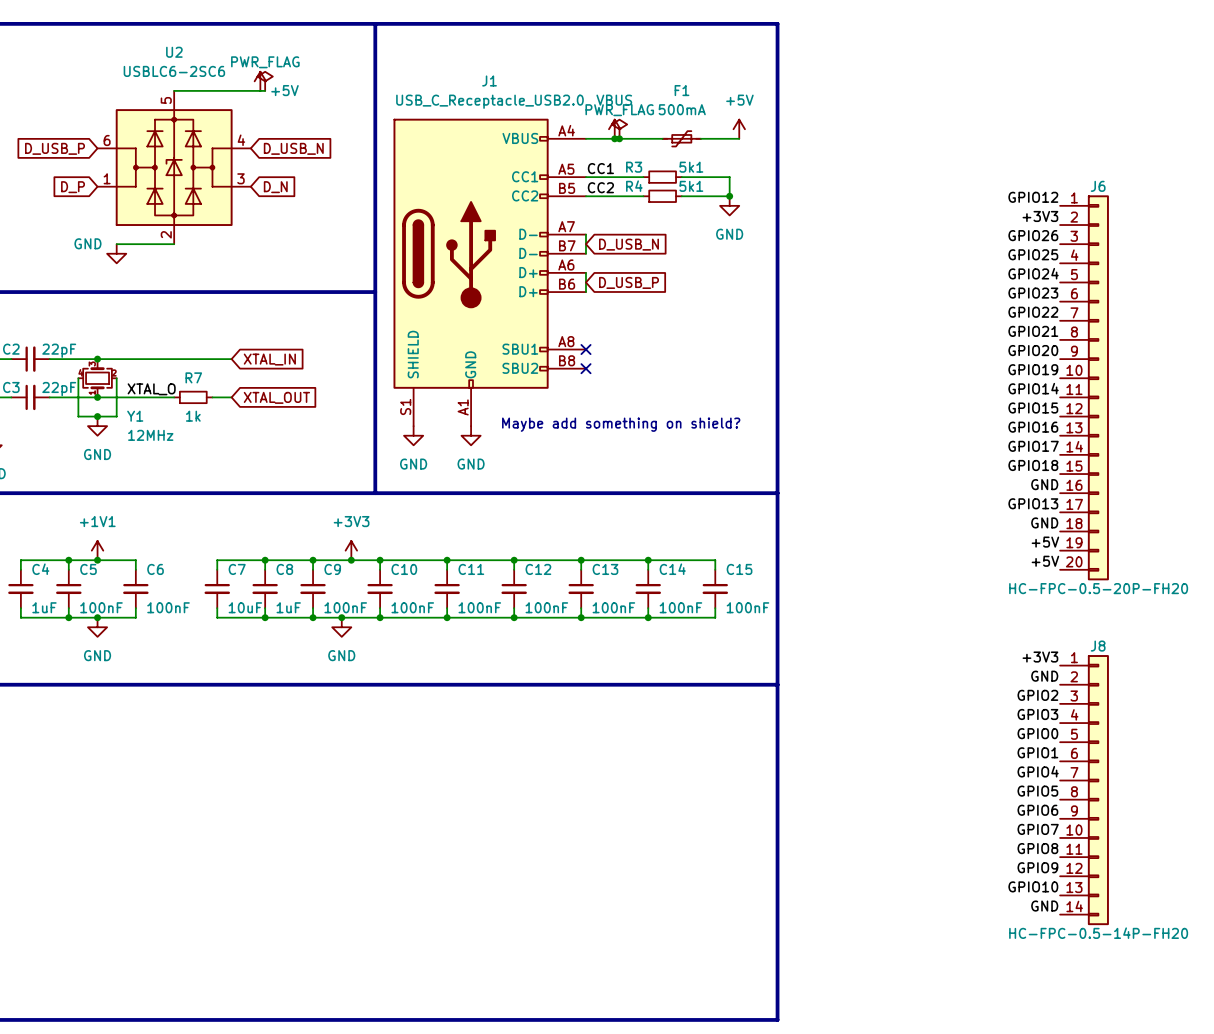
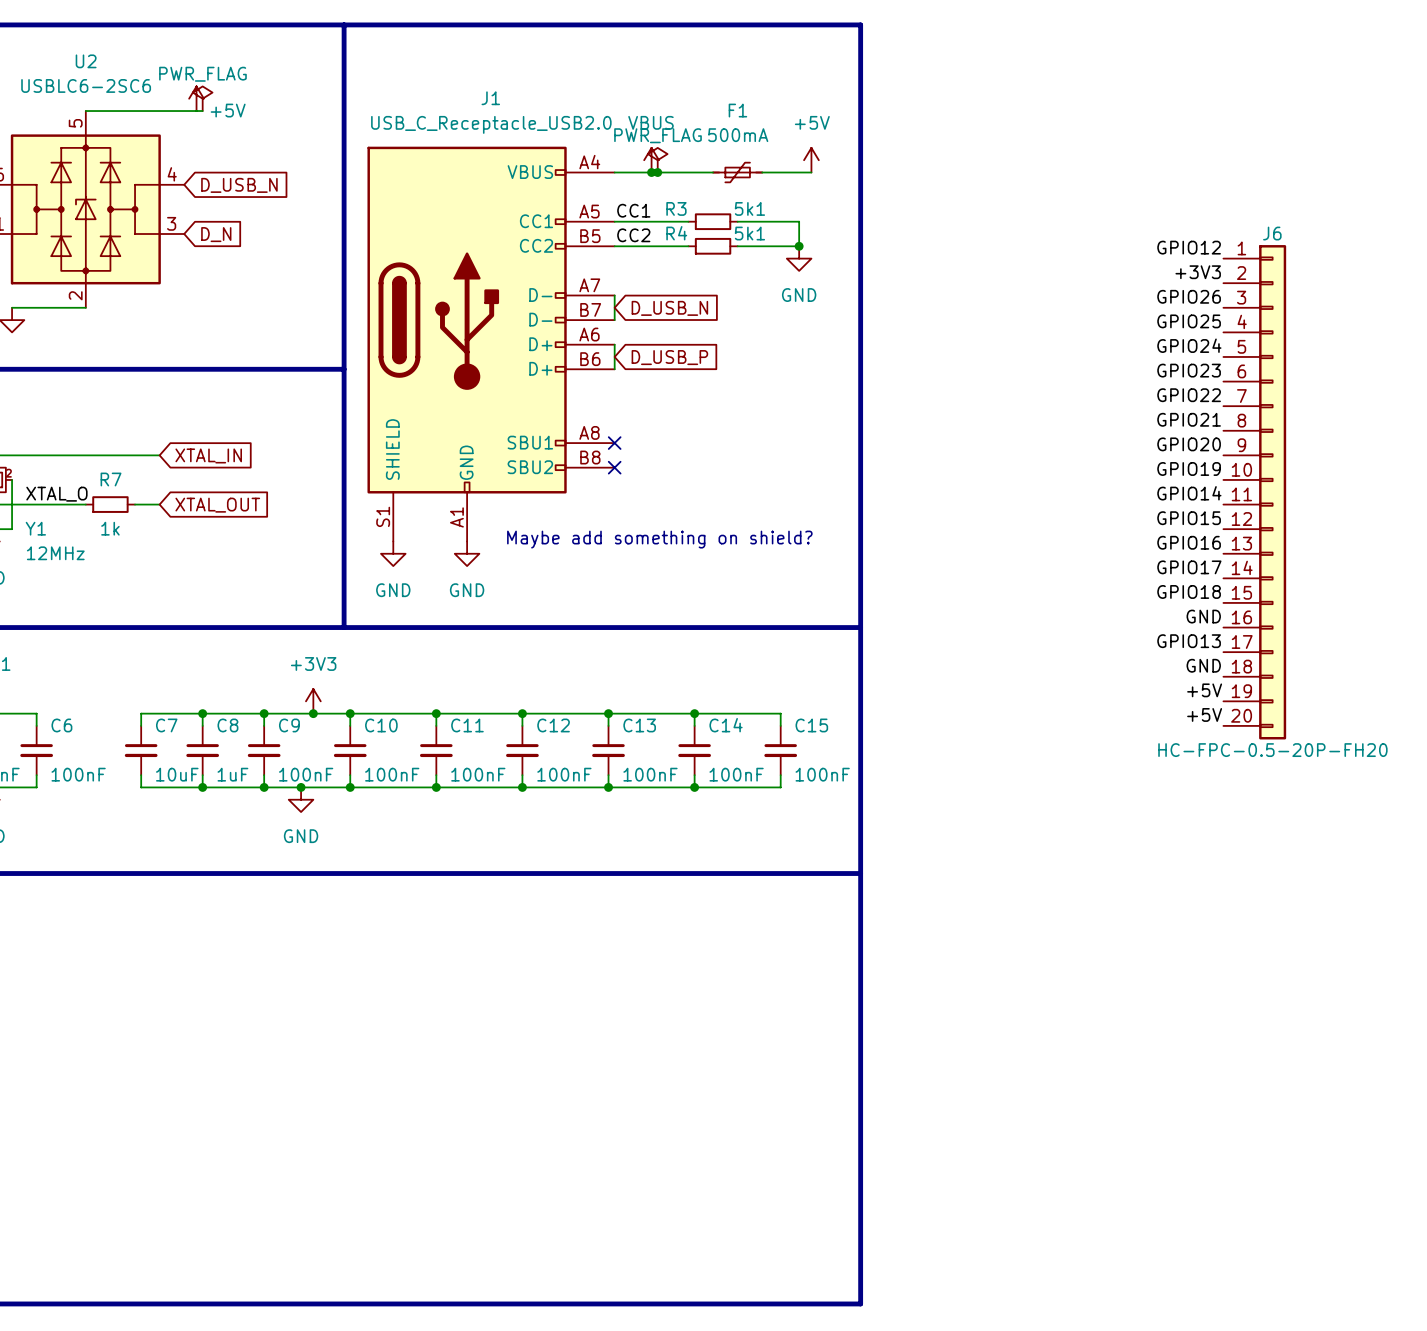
label: +3V3 (1040, 657) -> none
label: GND (1044, 676) -> none
label: GPIO2 (1037, 695) -> none
label: GPIO3 (1037, 714) -> none
label: GPIO0 (1037, 733) -> none
label: GPIO1 (1037, 752) -> none
label: GPIO4 (1038, 771) -> none
J8: HC-FPC-0.5-14P-FH20 (1084, 790) -> none
label: GPIO5 (1037, 791) -> none
label: GPIO6 (1037, 810) -> none
label: GPIO7 (1038, 829) -> none
label: GPIO8 (1037, 848) -> none
label: GPIO9 (1037, 867) -> none
label: GPIO10 (1033, 886) -> none
label: GND (1044, 906) -> none

